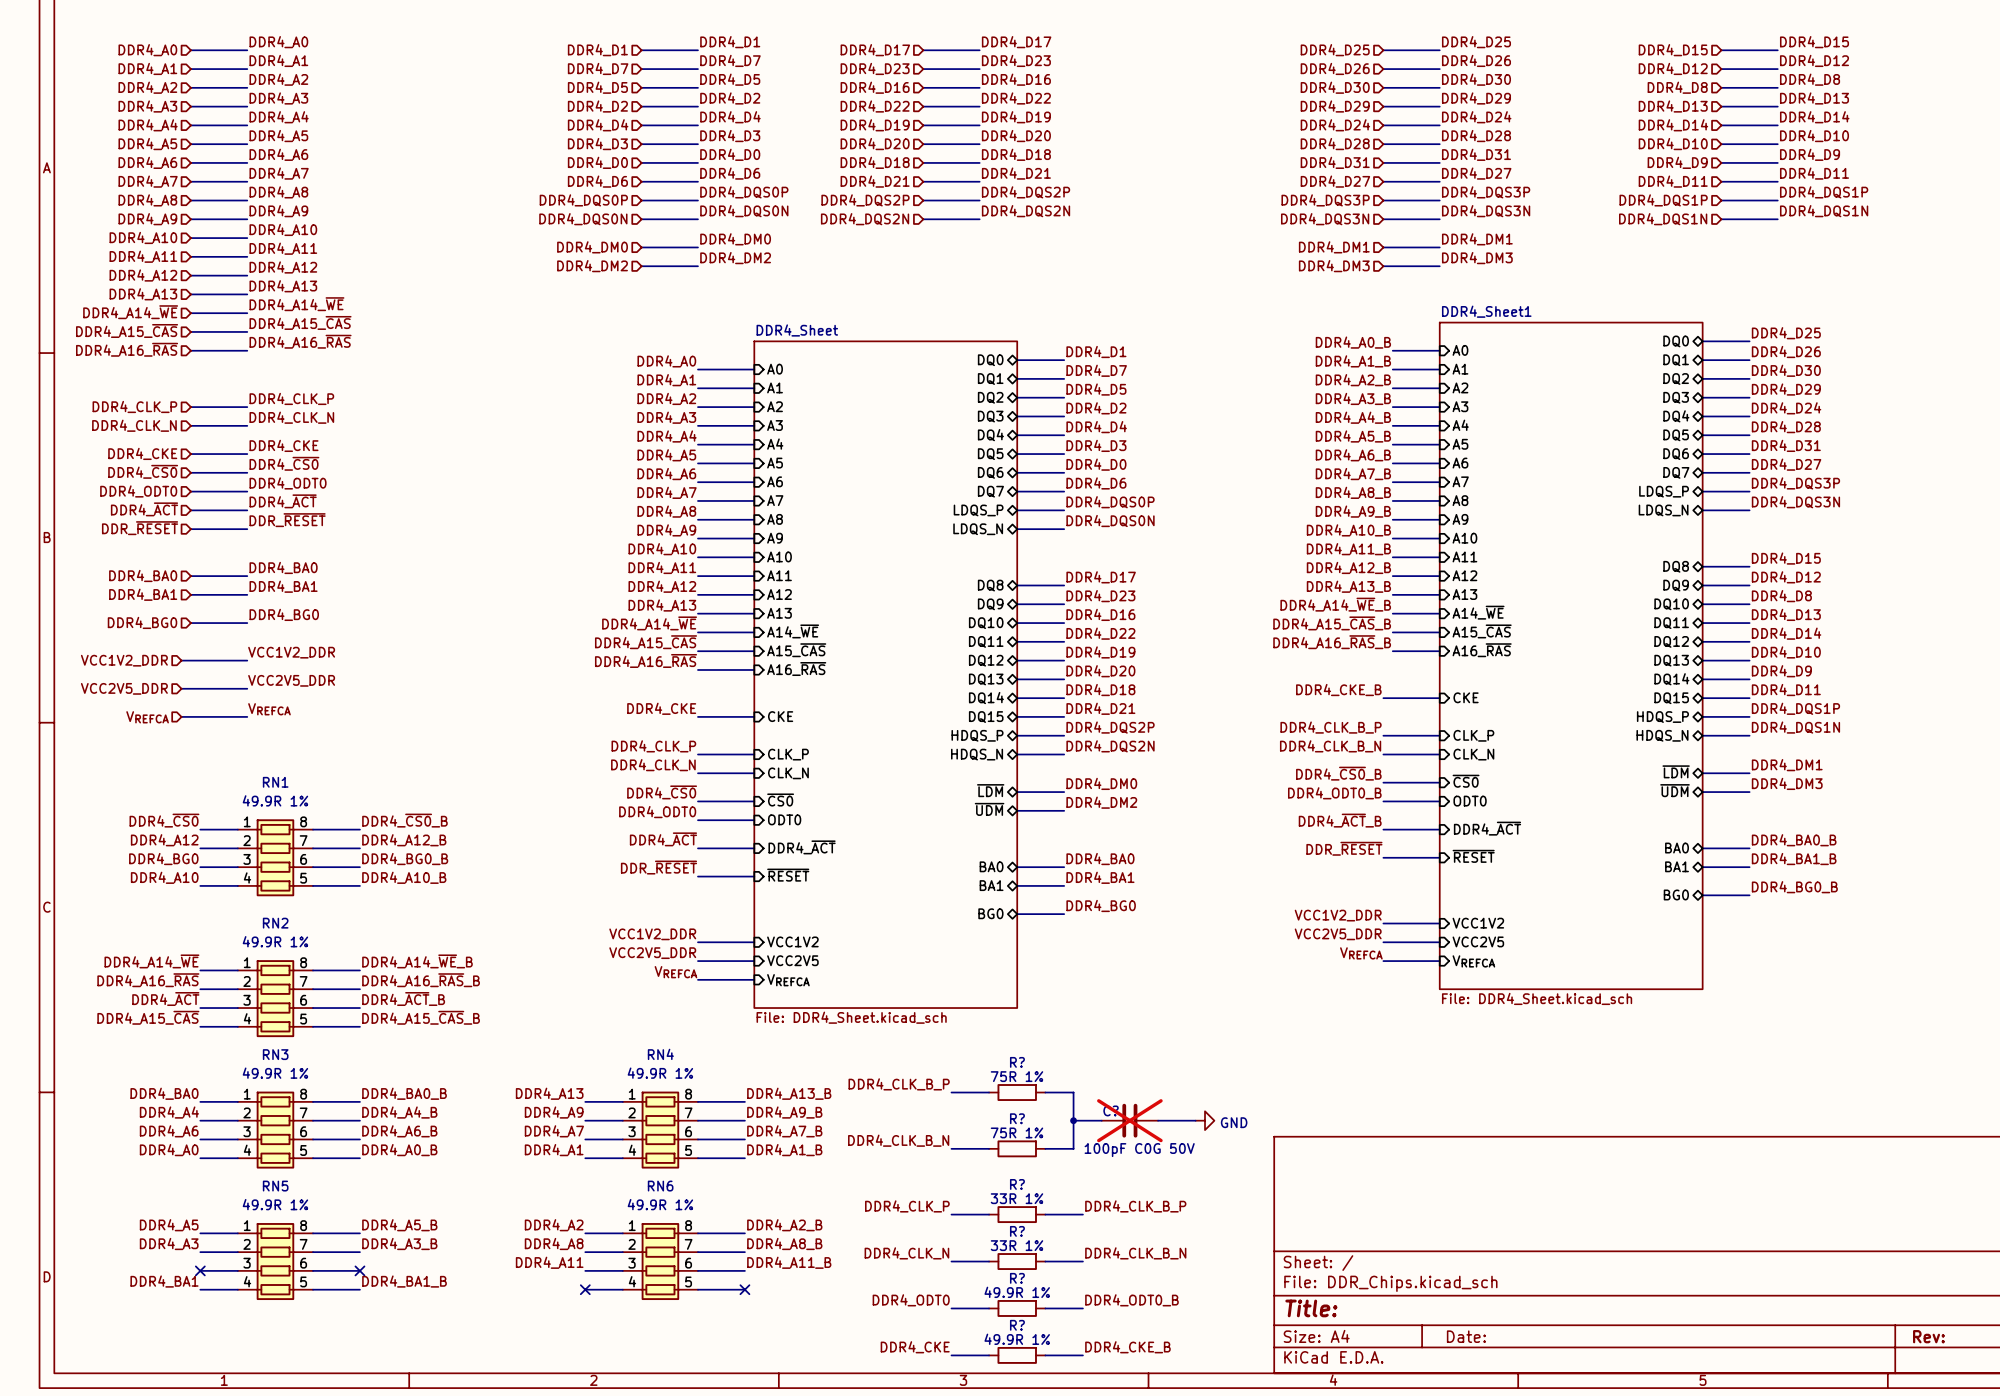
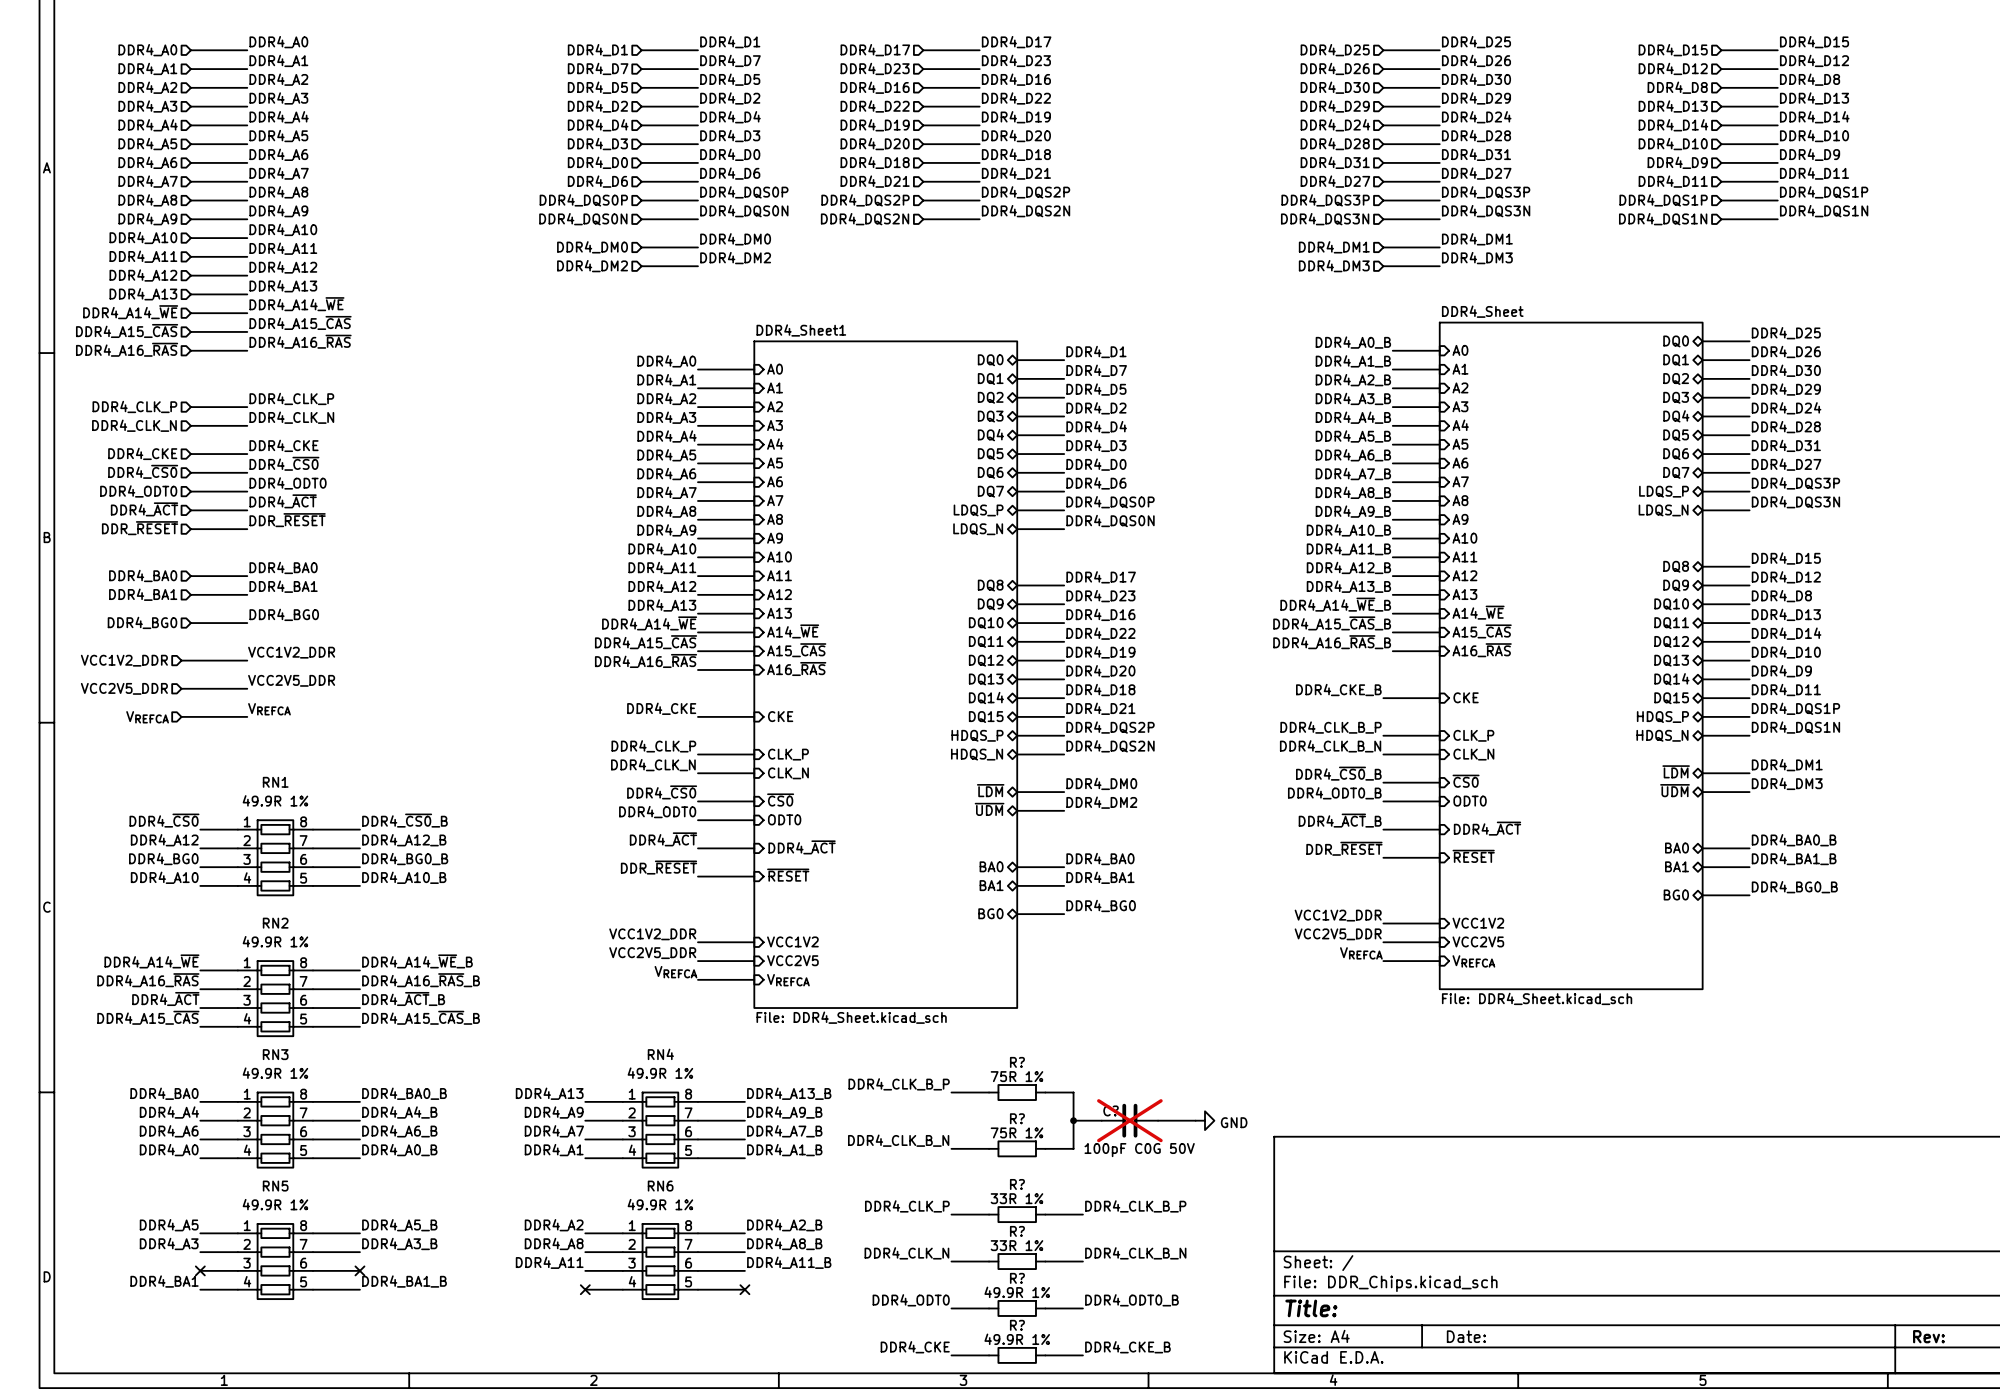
sheet DDR4_Sheet1 name: DDR4_Sheet1 (1486, 311) -> DDR4_Sheet (1482, 311)
sheet DDR4_Sheet name: DDR4_Sheet (797, 330) -> DDR4_Sheet1 (801, 330)

